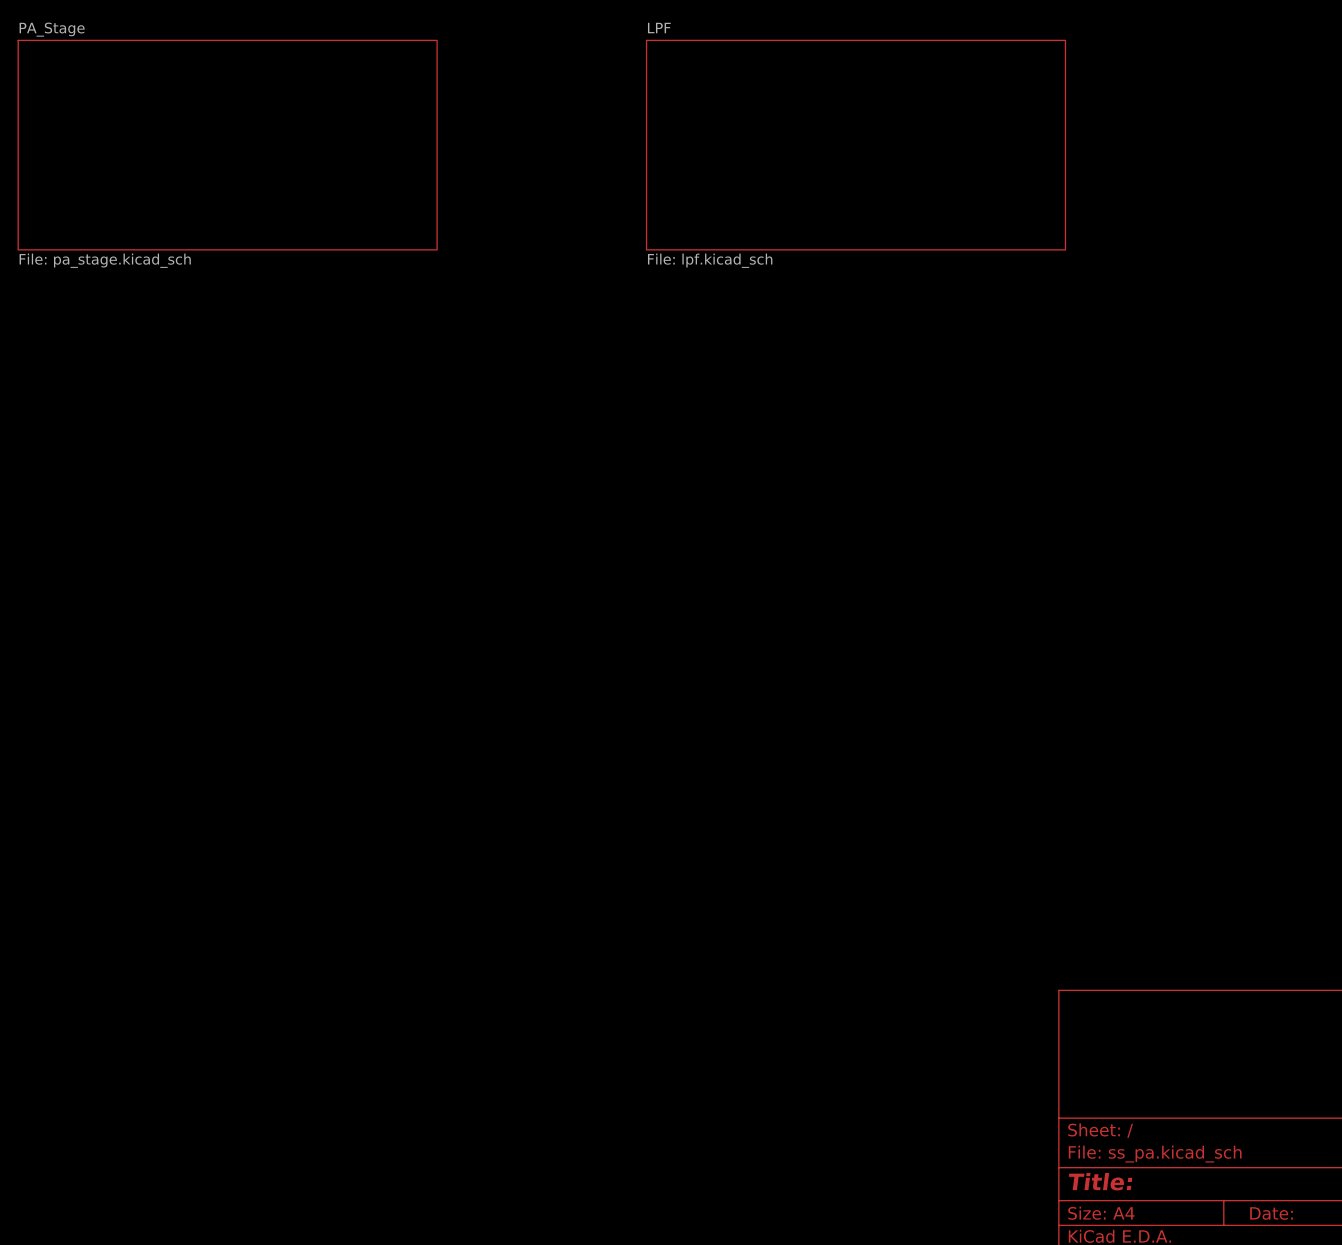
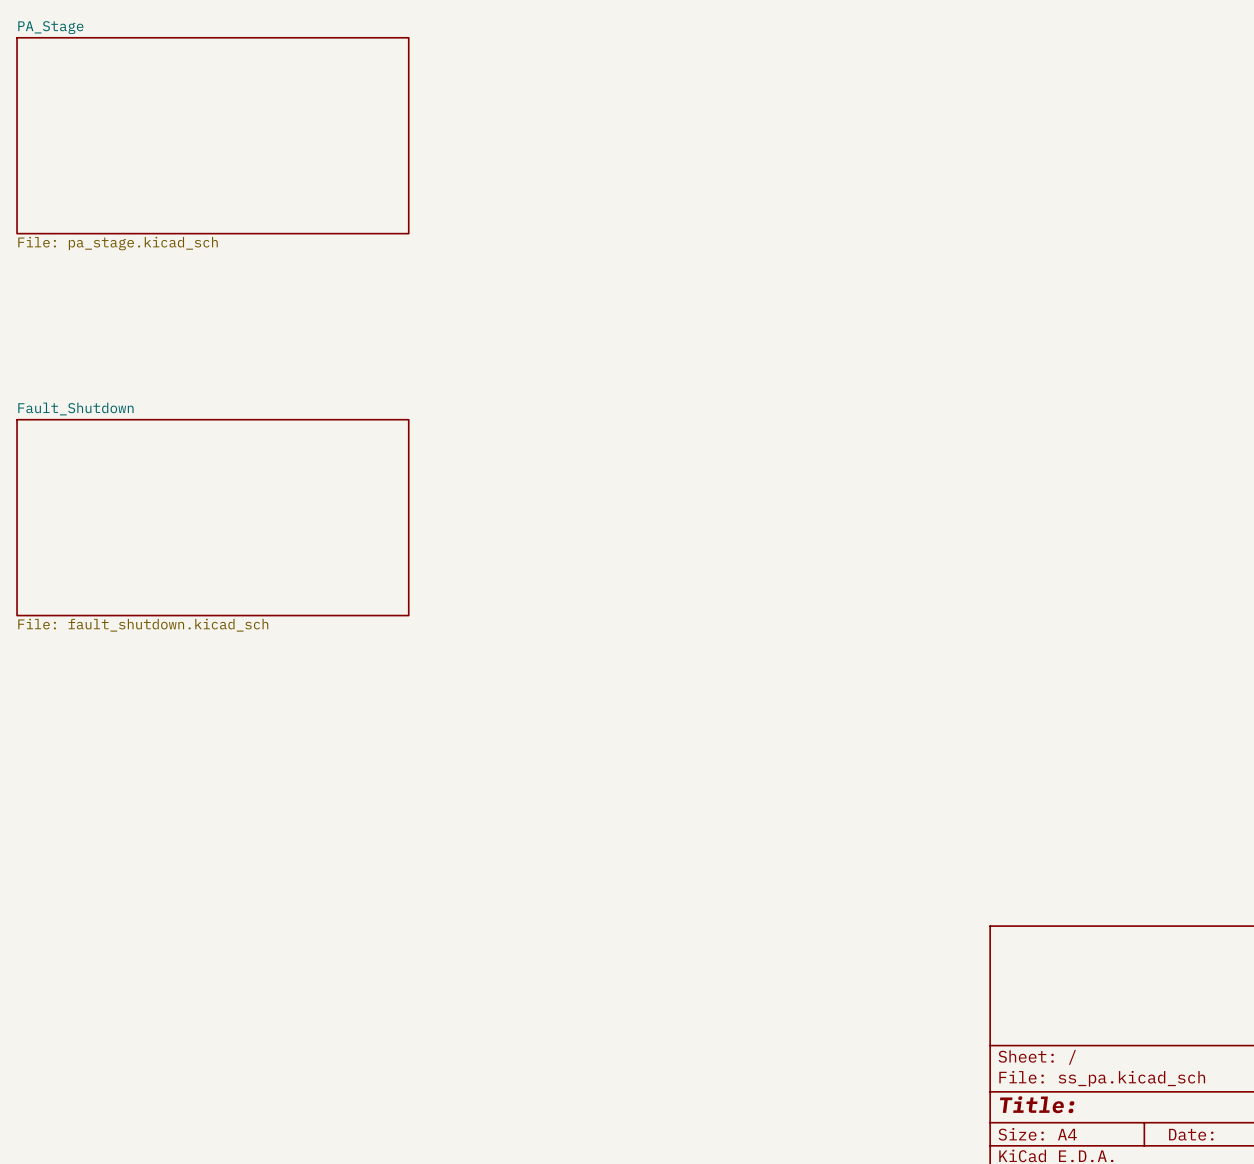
sheet LPF: File: lpf.kicad_sch (856, 145) -> none
sheet Fault_Shutdown: none -> File: fault_shutdown.kicad_sch (212, 517)

